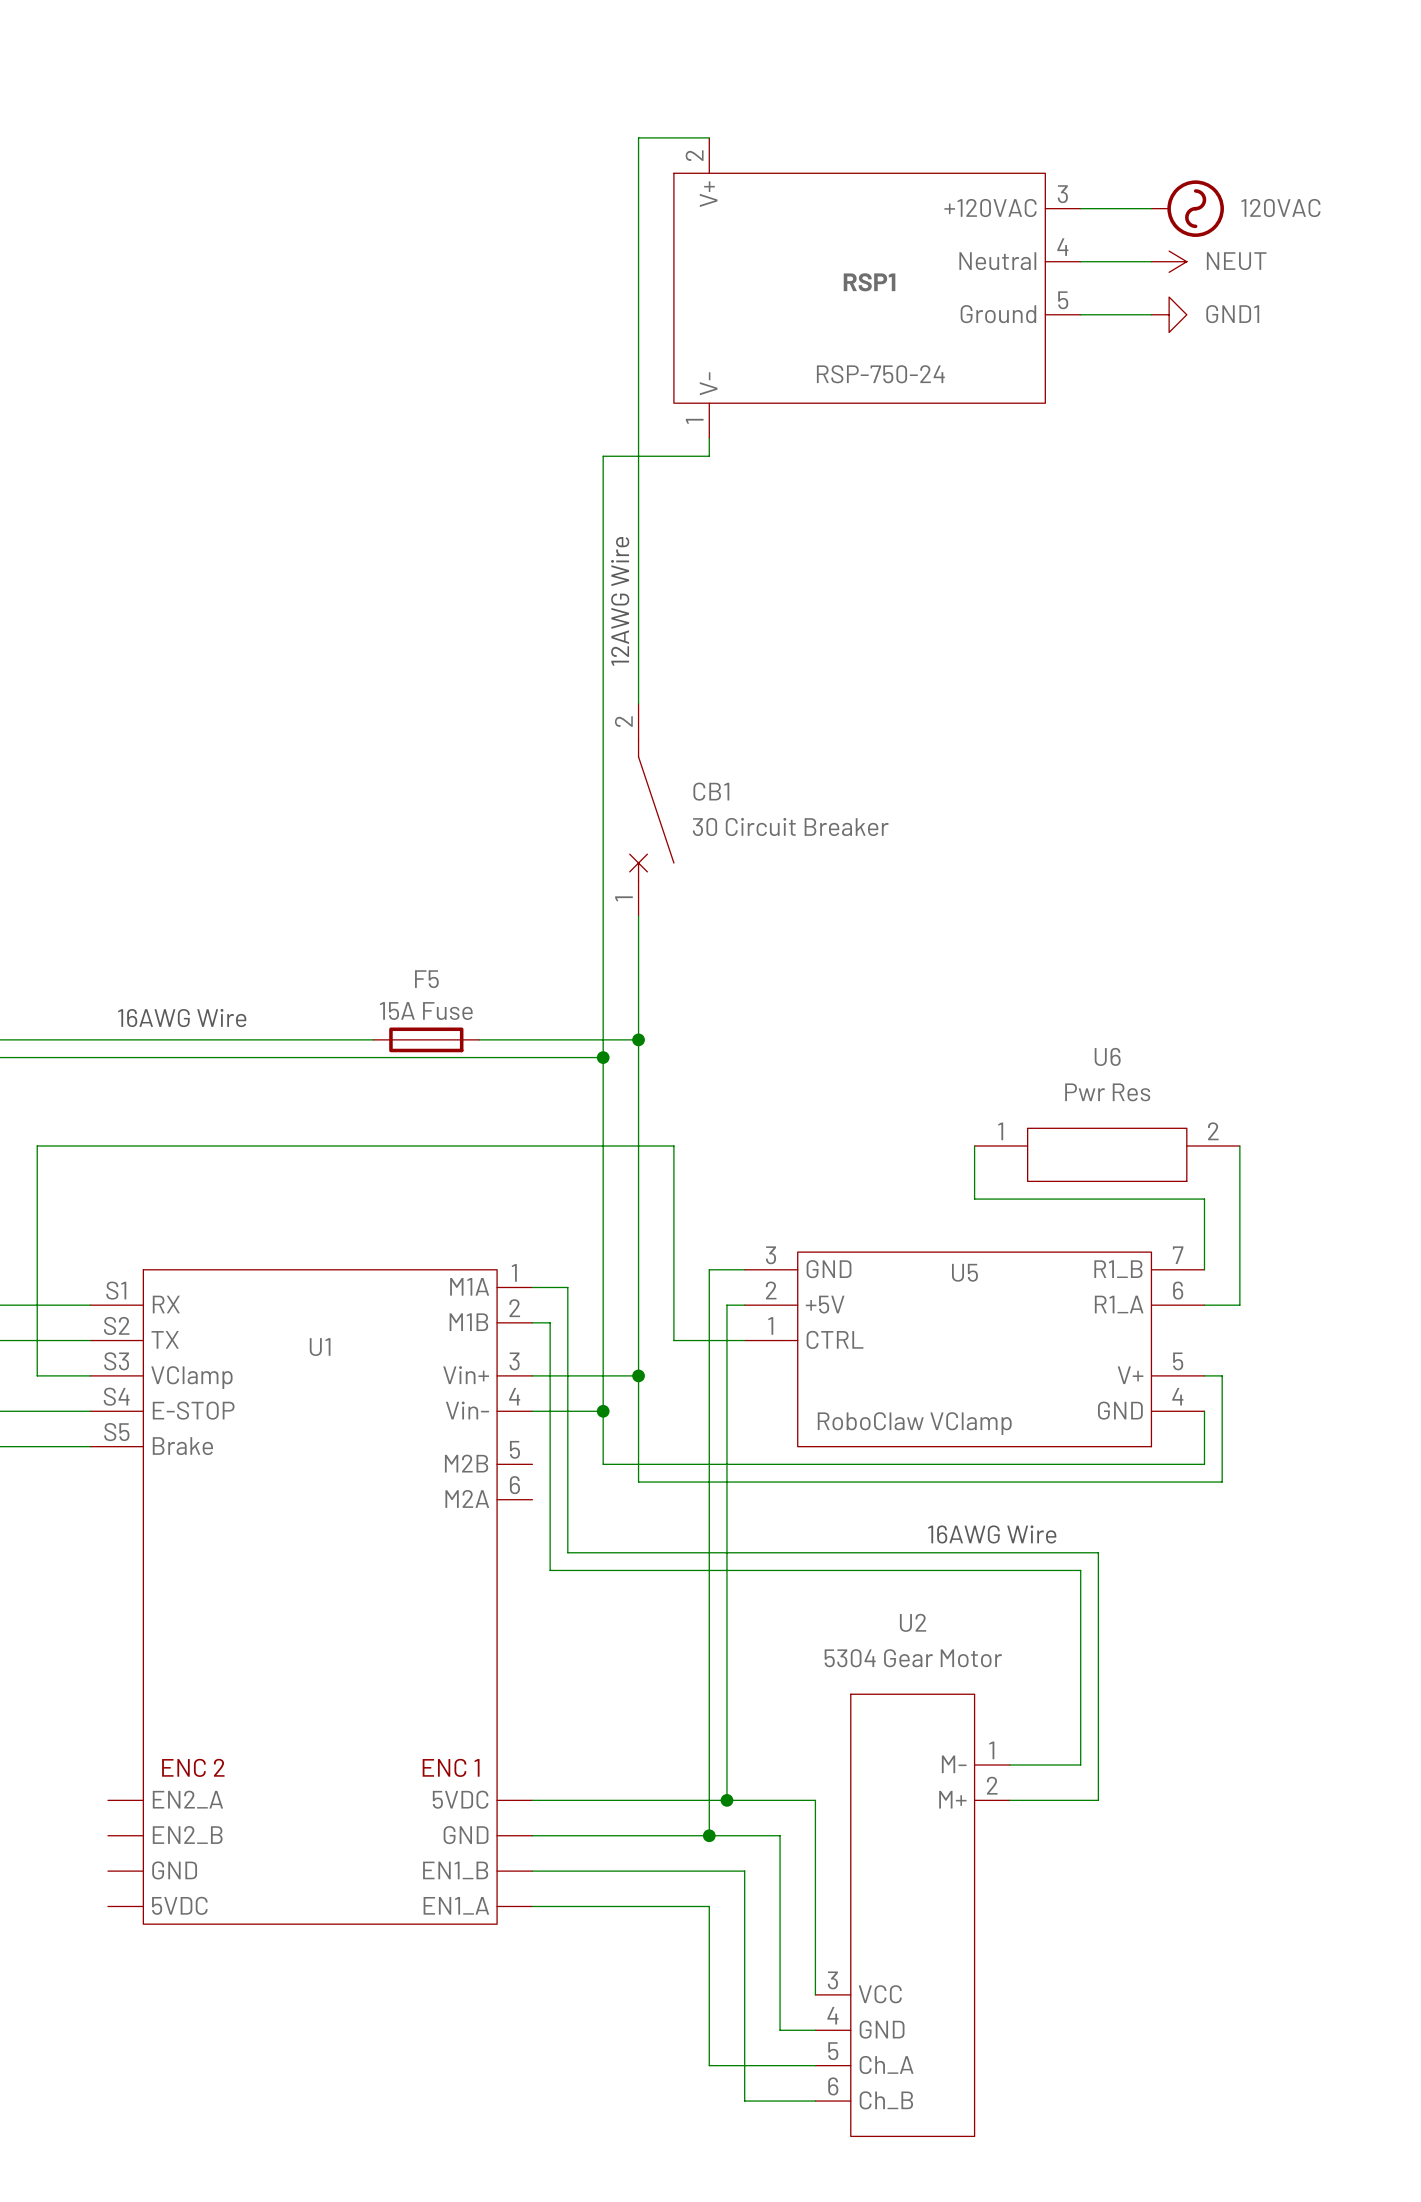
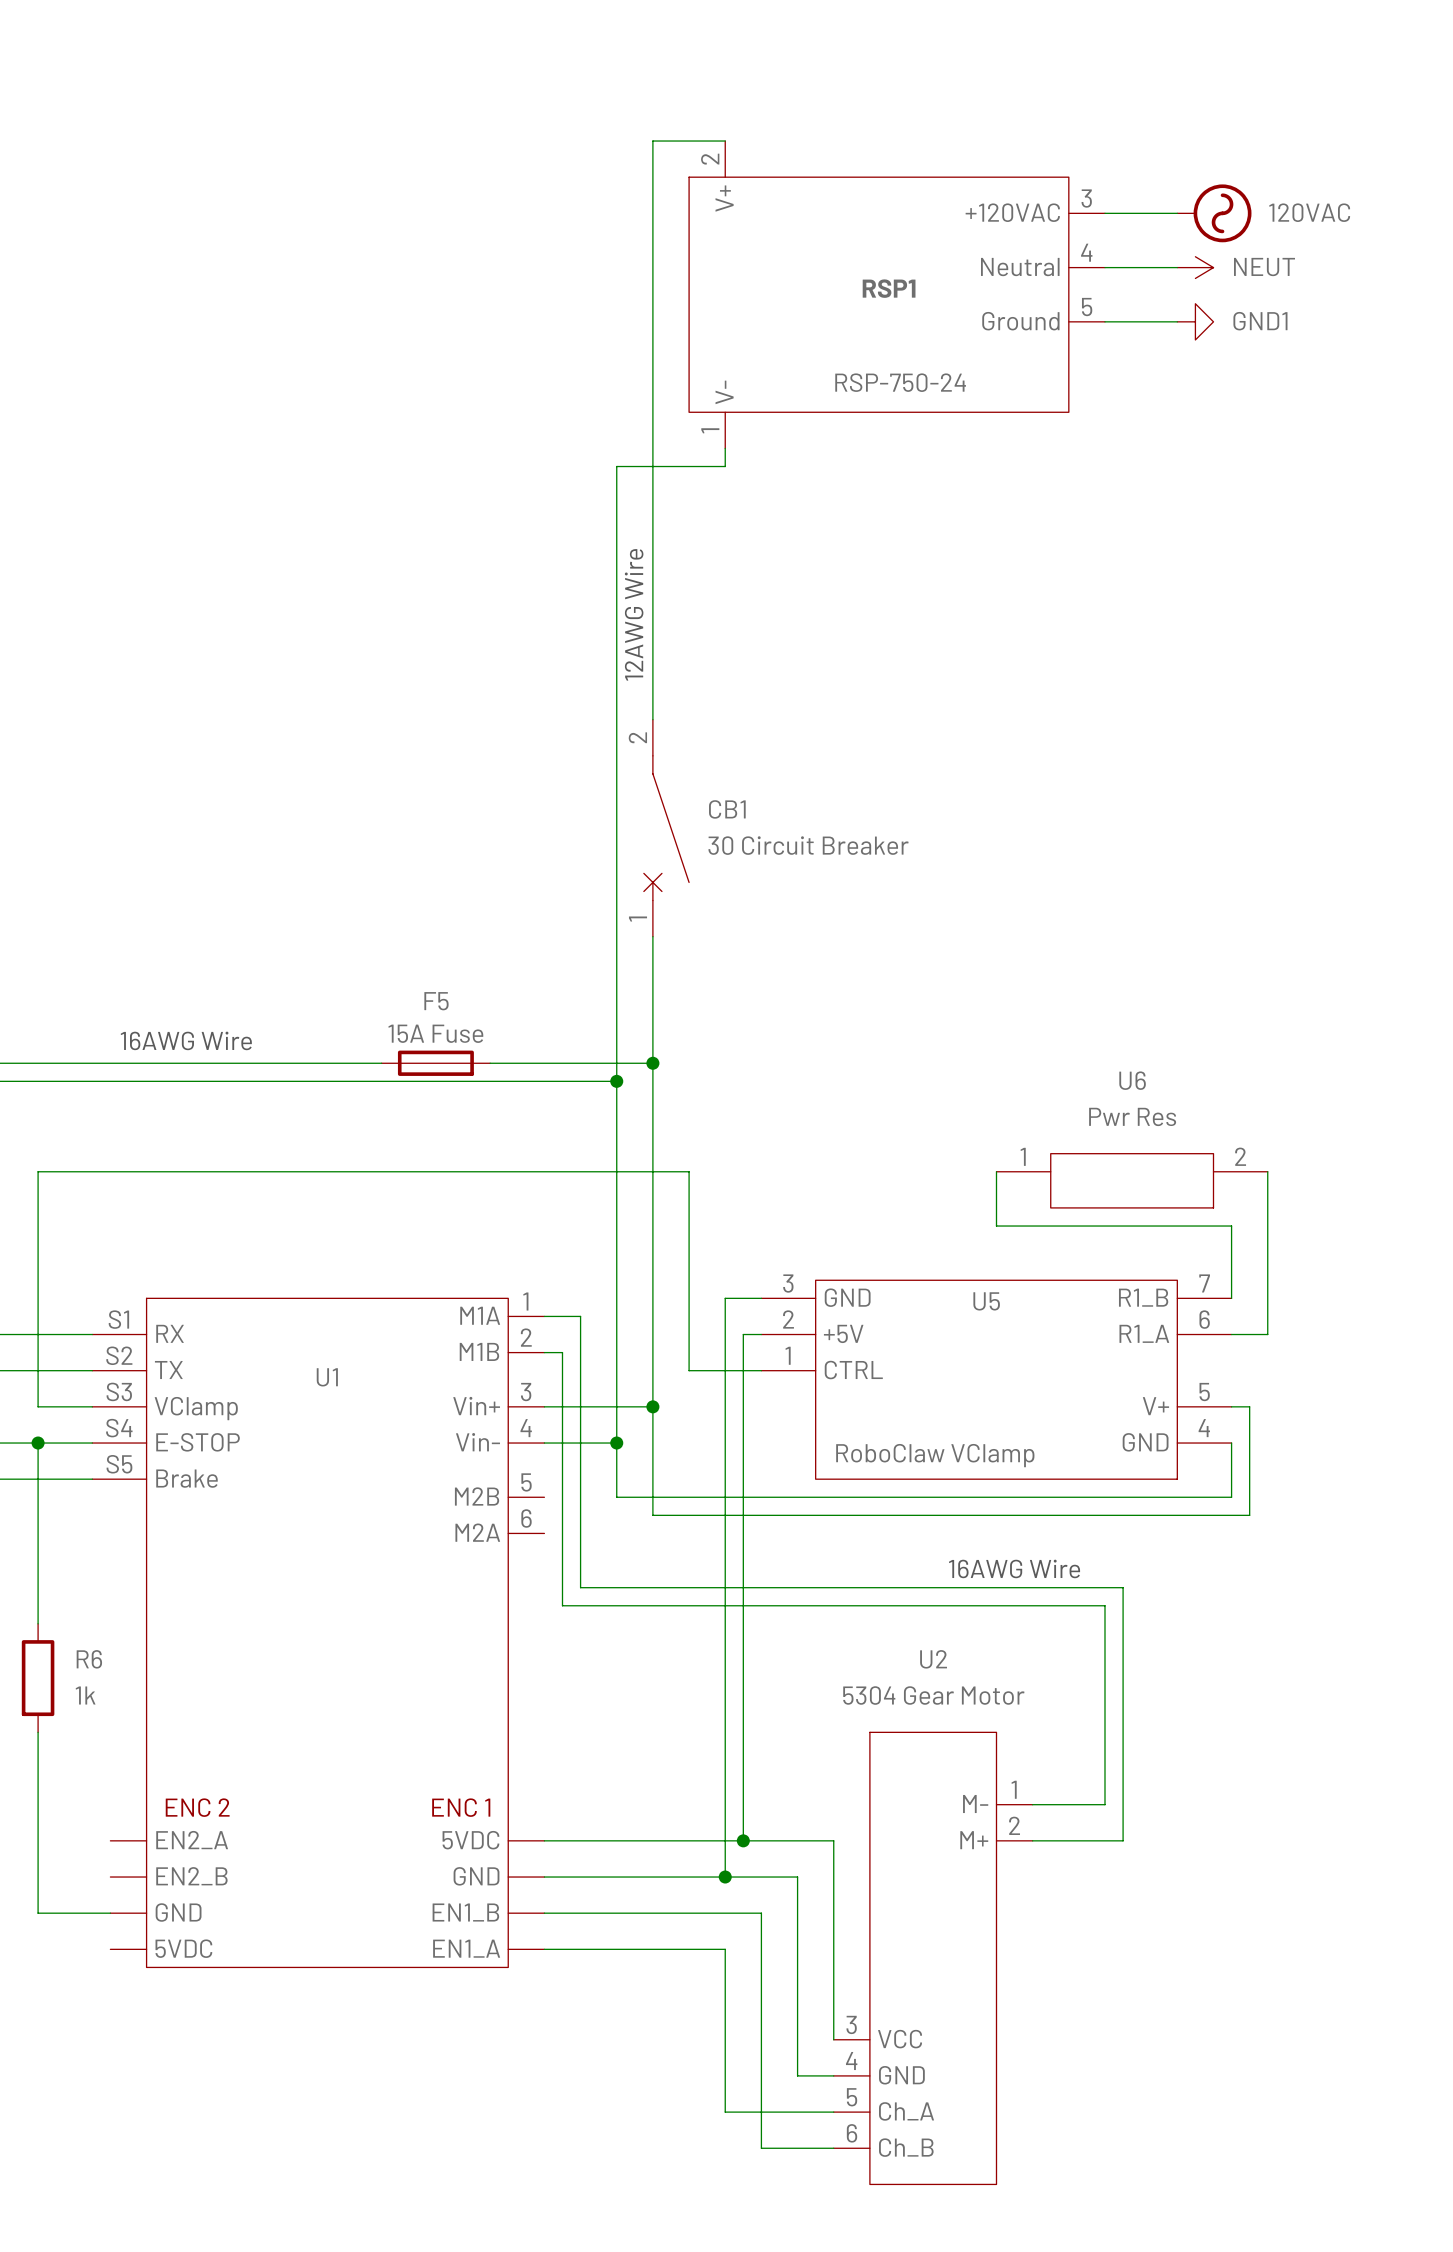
wire: none -> (38, 1443) (38, 1623)
junction: none -> (38, 1443)
R6: none -> 1k (38, 1678)
wire: none -> (38, 1732) (38, 1913) (110, 1913)

